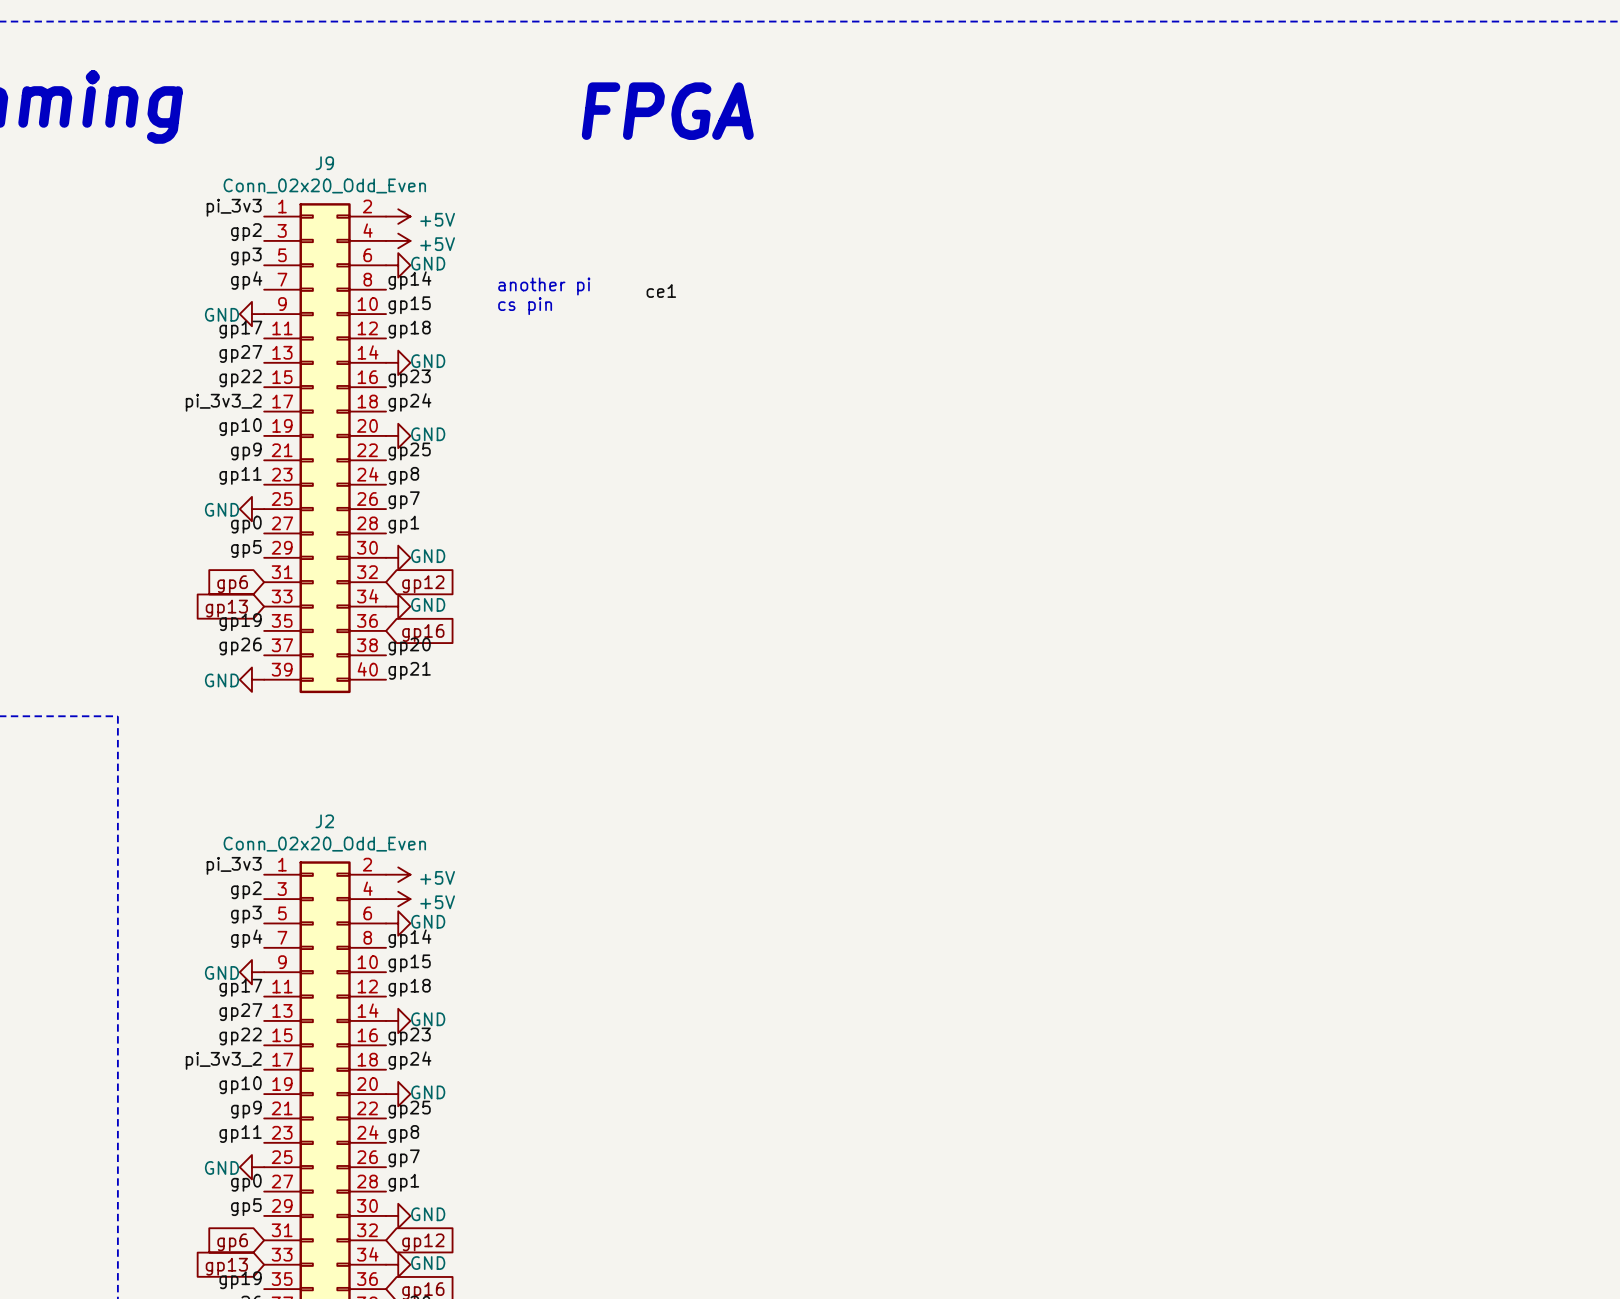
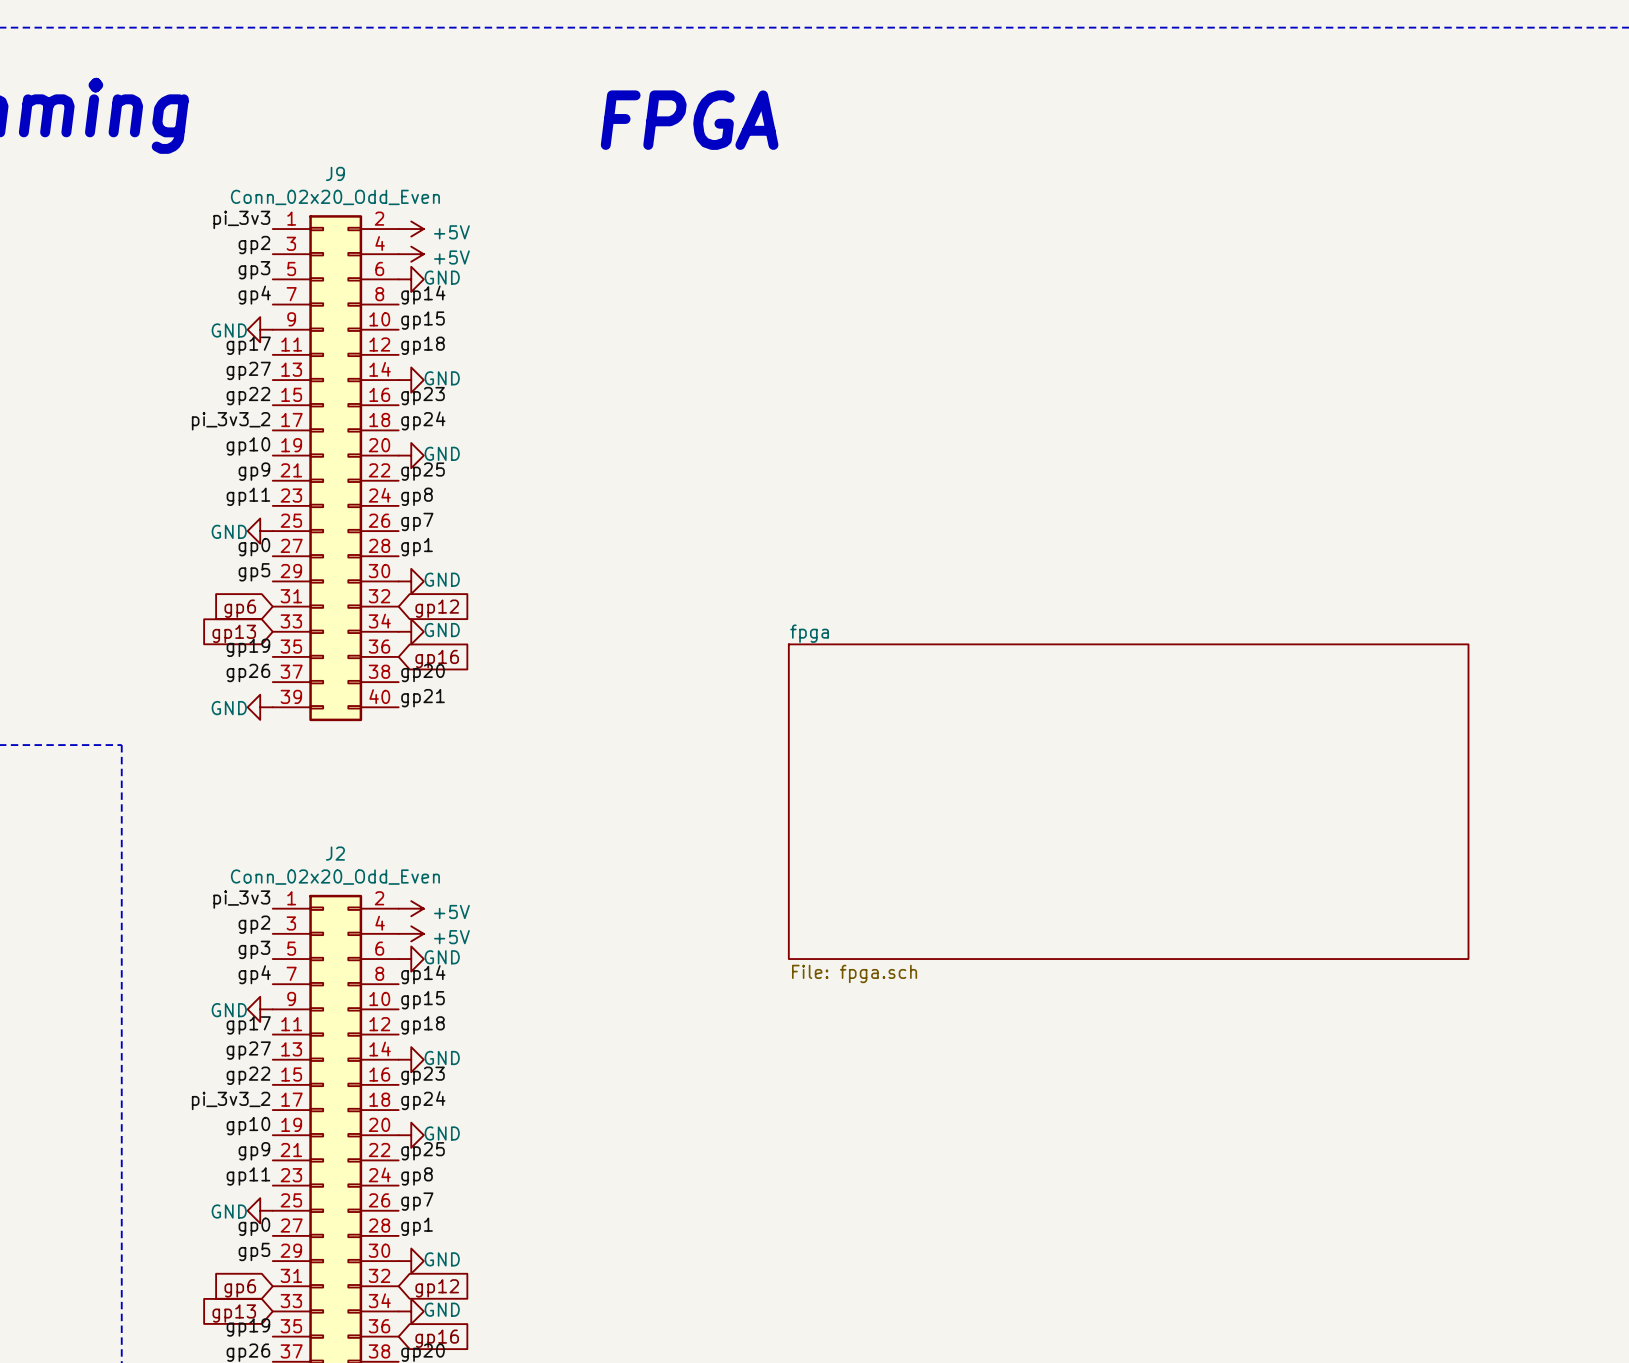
text: another pi (544, 286) -> none
label: ce1 (661, 291) -> none
text: cs pin (525, 306) -> none
sheet fpga: none -> File: fpga.sch (1128, 801)

